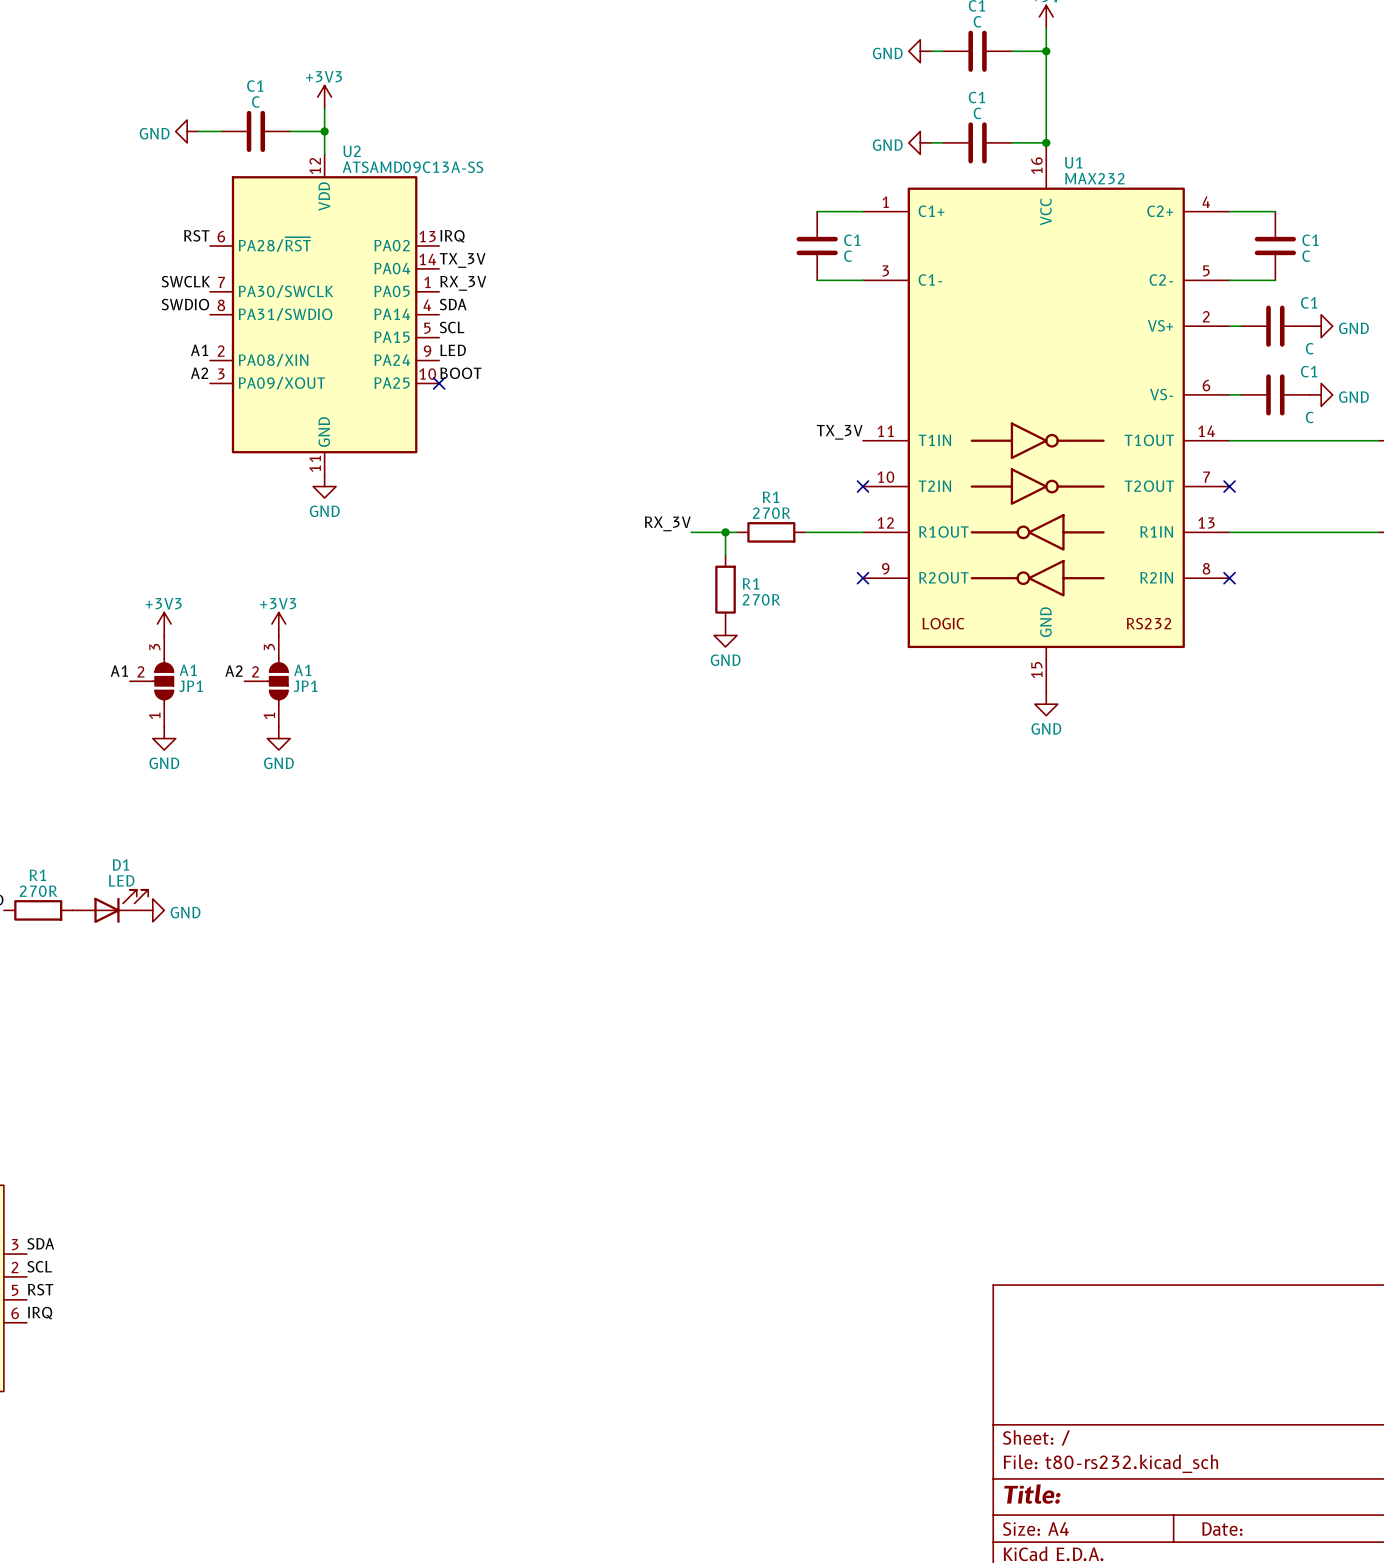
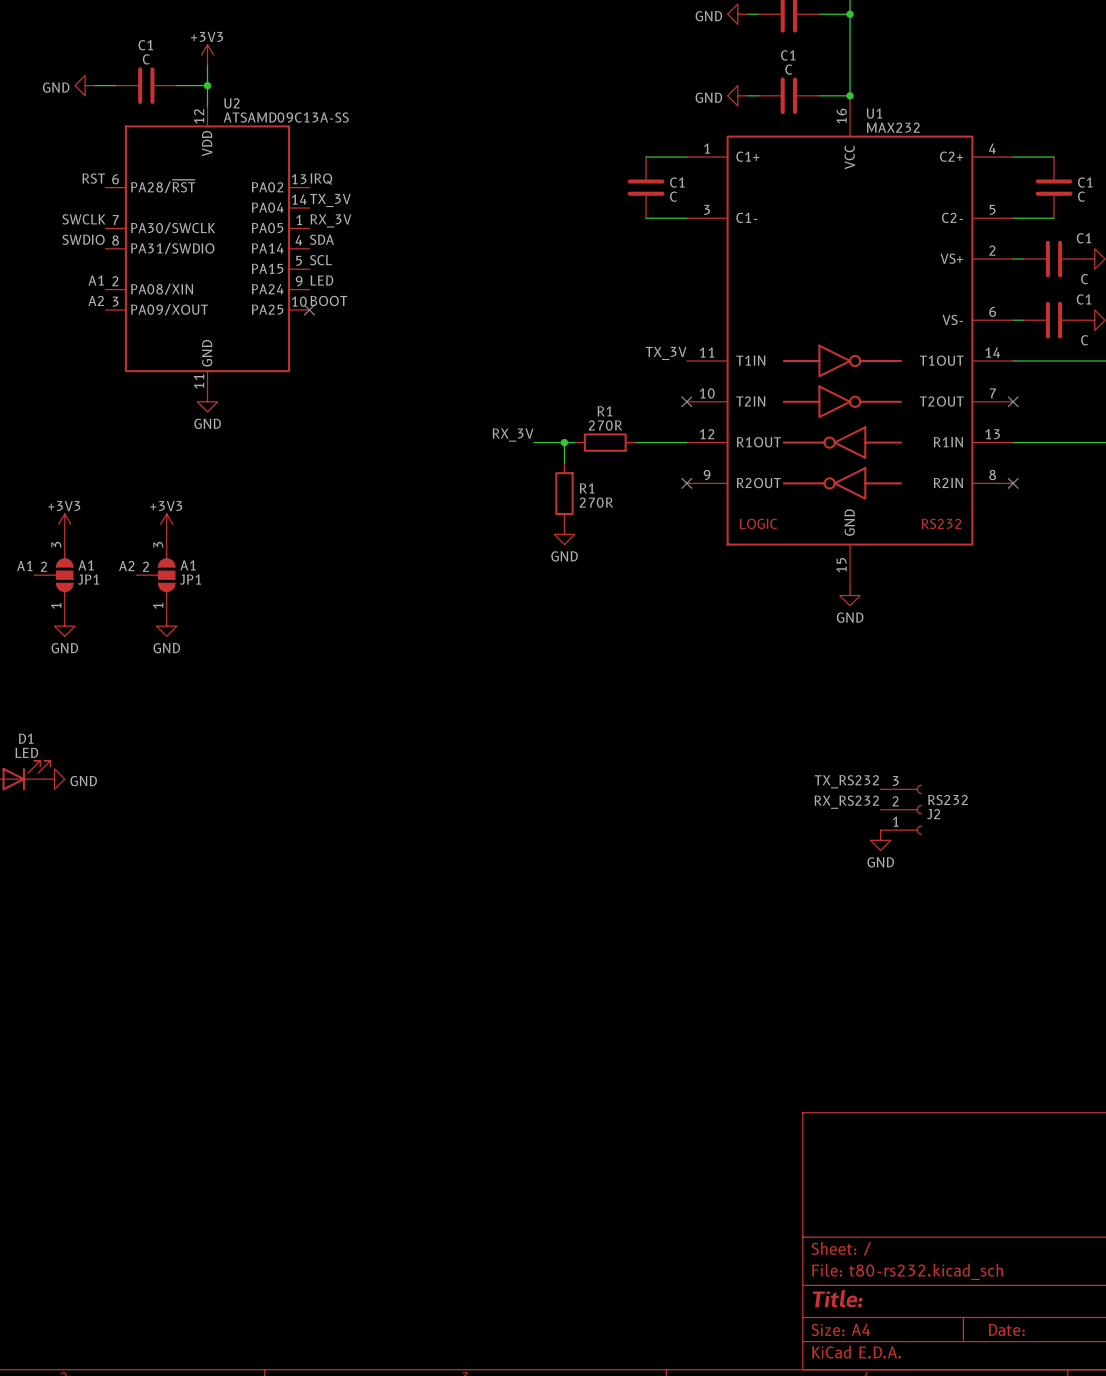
label: none -> TX_RS232 (846, 781)
label: none -> RX_RS232 (846, 802)
J2: none -> RS232 (901, 809)
power symbol: none -> GND (880, 840)

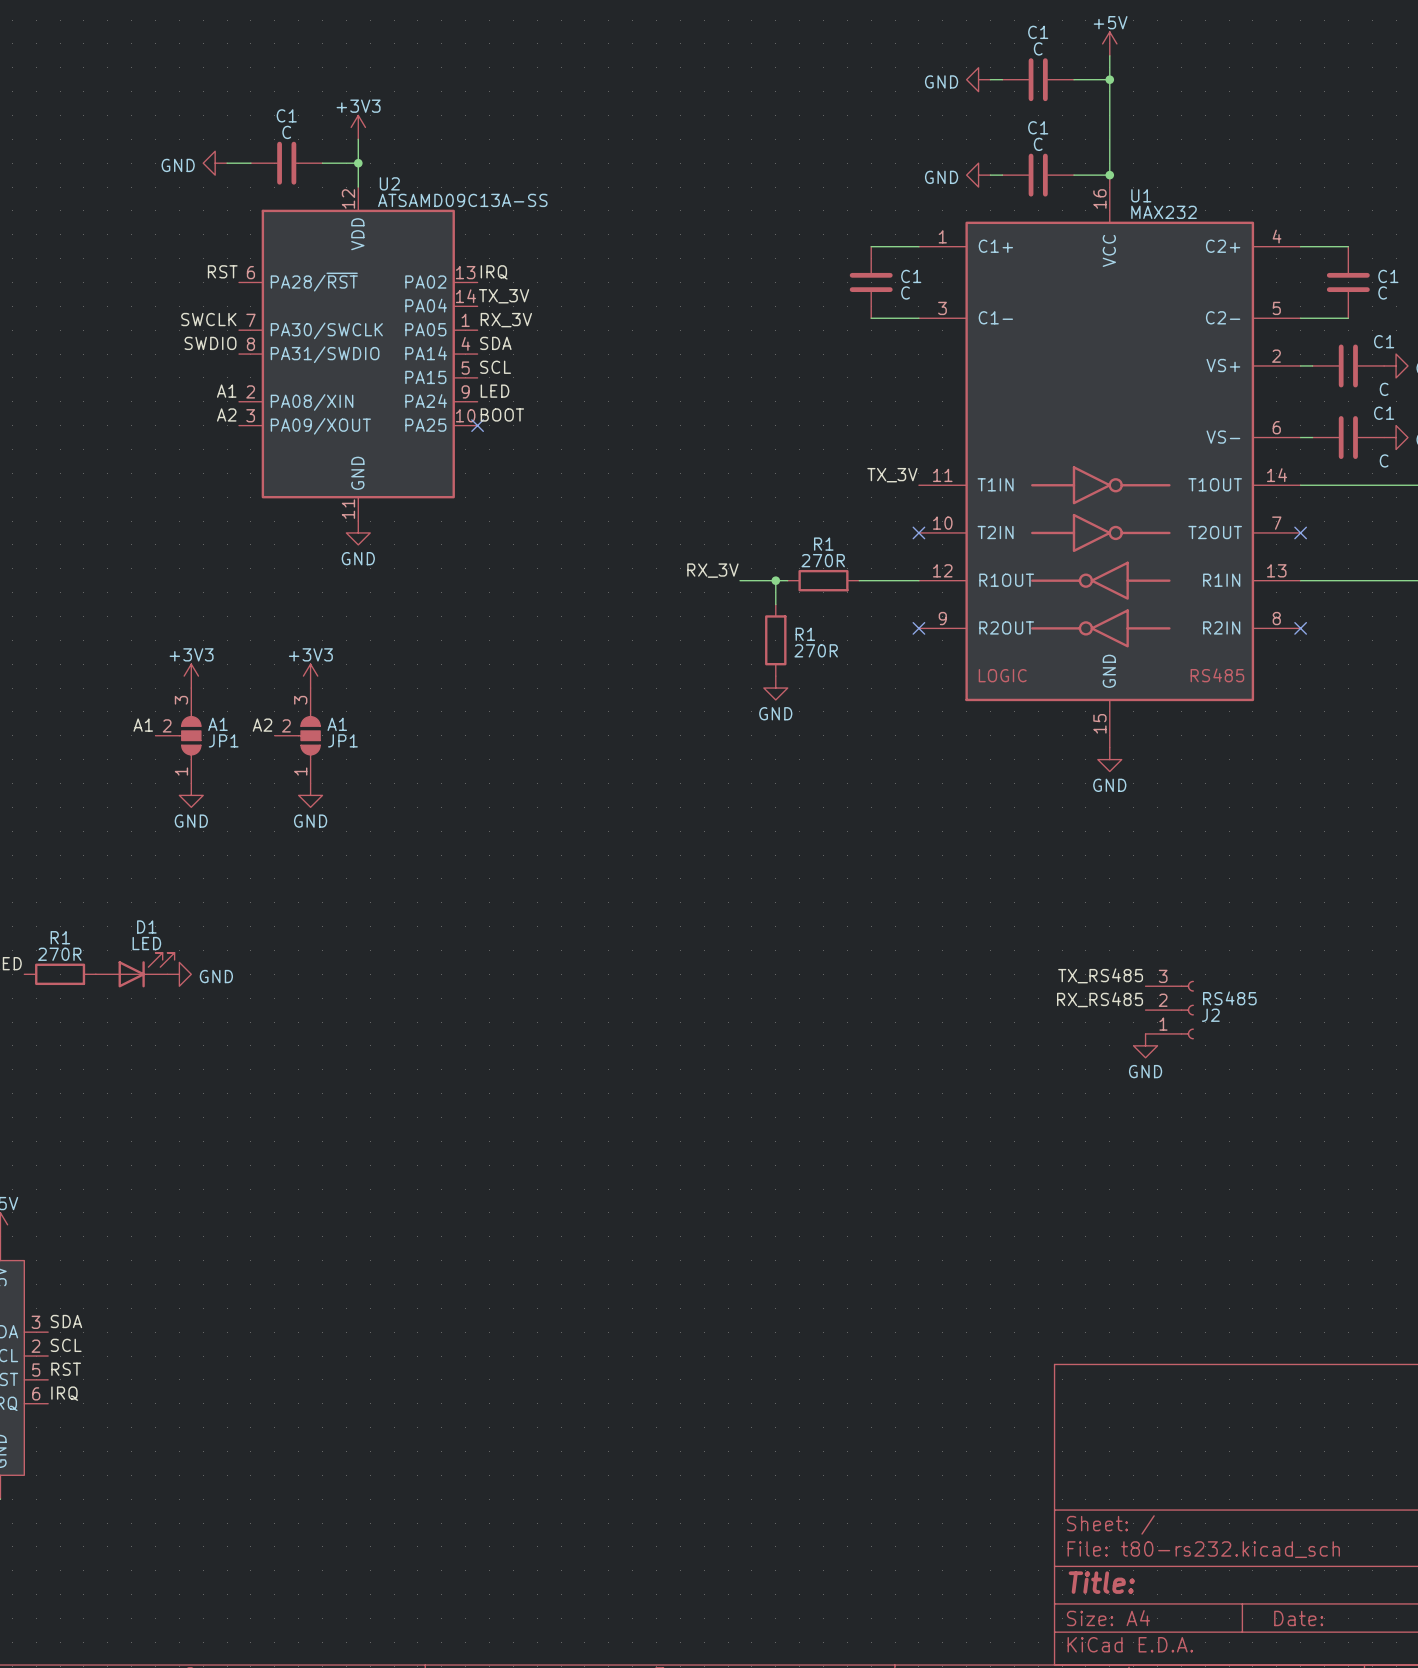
U1 text: RS232 (941, 523) -> RS485 (1217, 675)
label: TX_RS232 (846, 781) -> TX_RS485 (1100, 975)
J2 value: RS232 (947, 800) -> RS485 (1229, 998)
label: RX_RS232 (846, 802) -> RX_RS485 (1100, 999)

